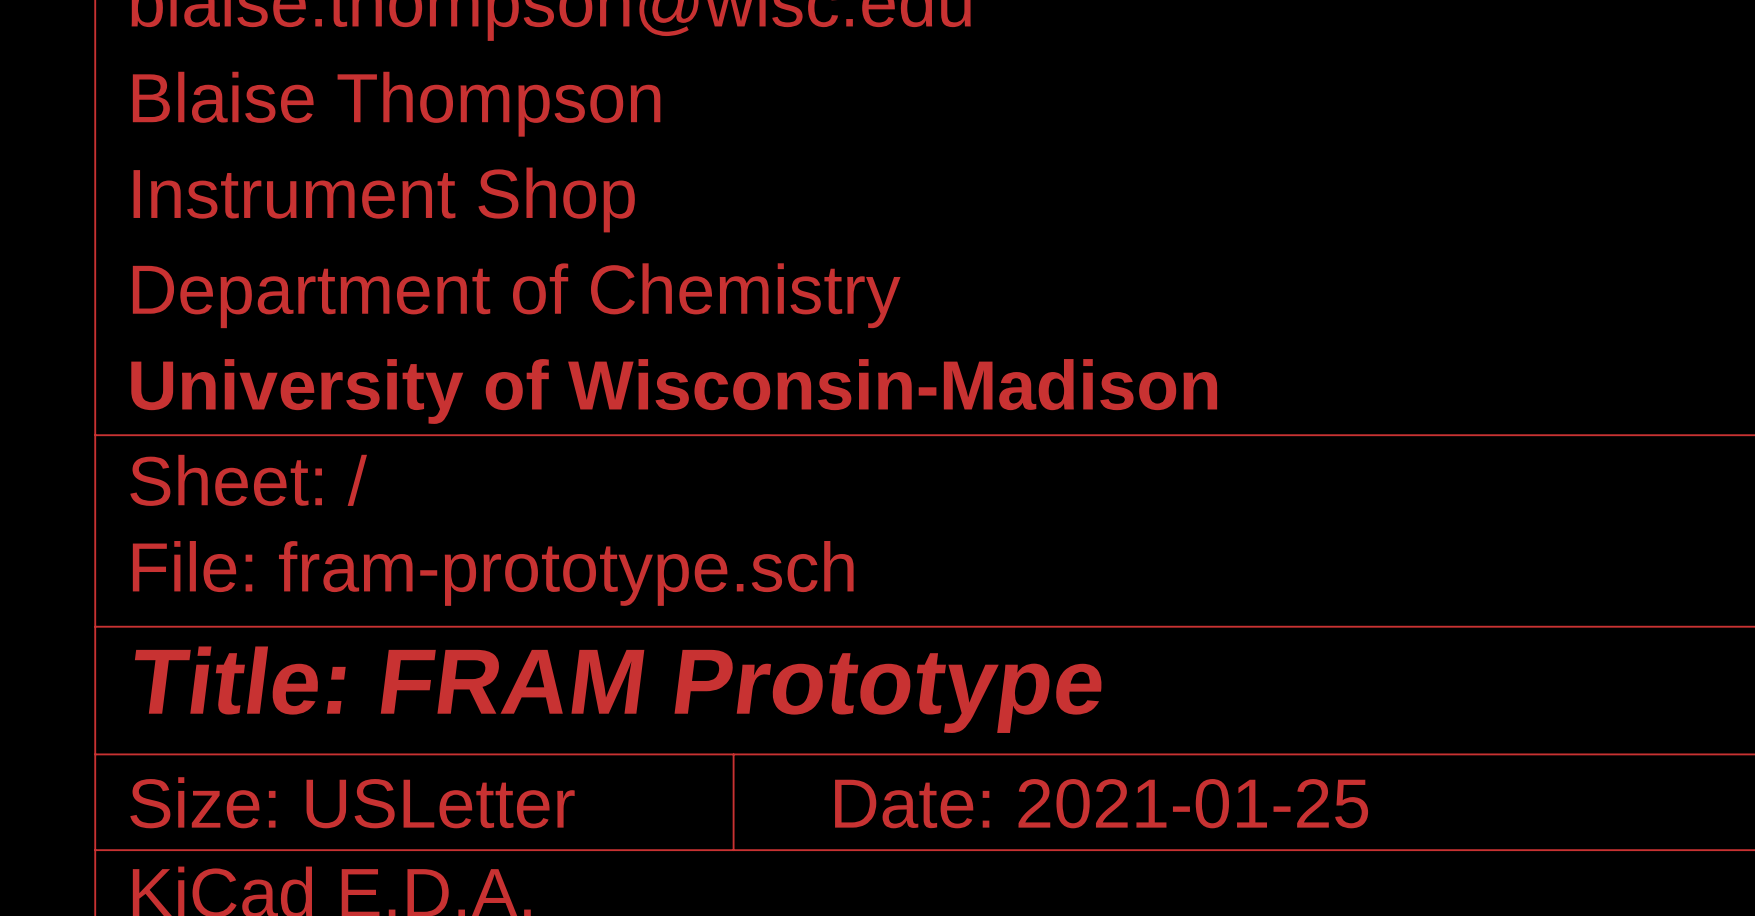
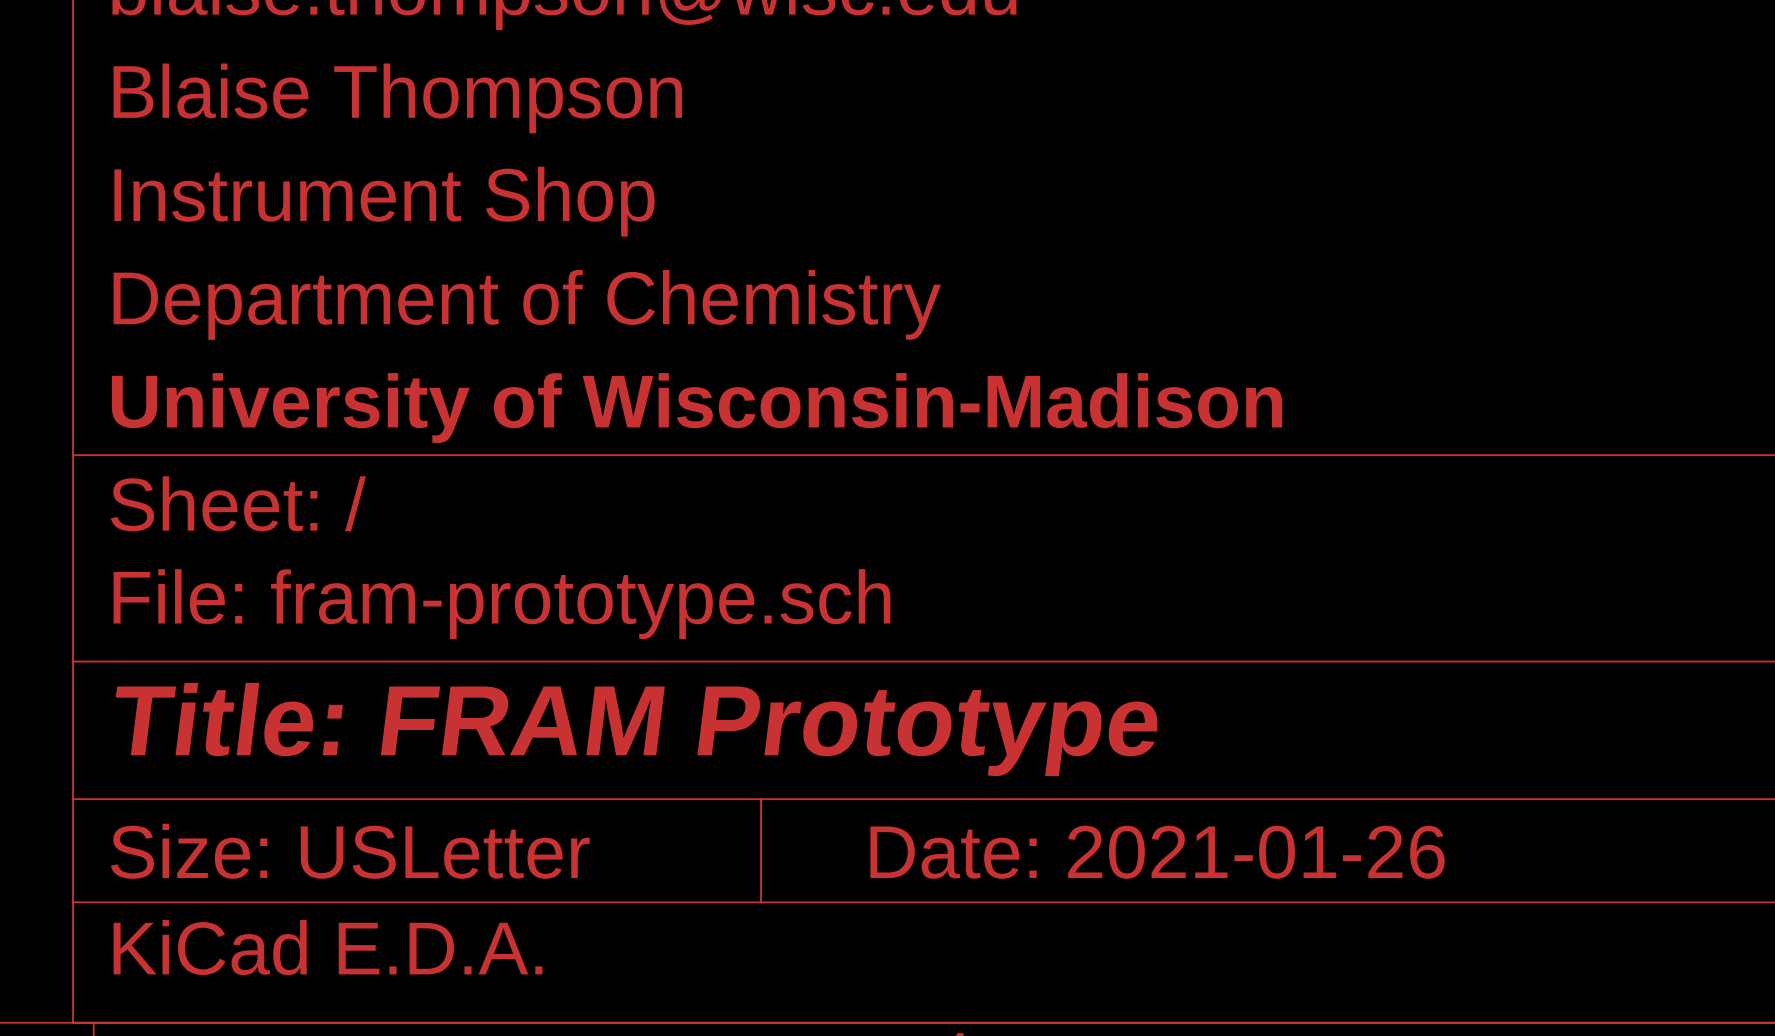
title block: Date: 2021-01-25 (1101, 803) -> Date: 2021-01-26 (1157, 852)

